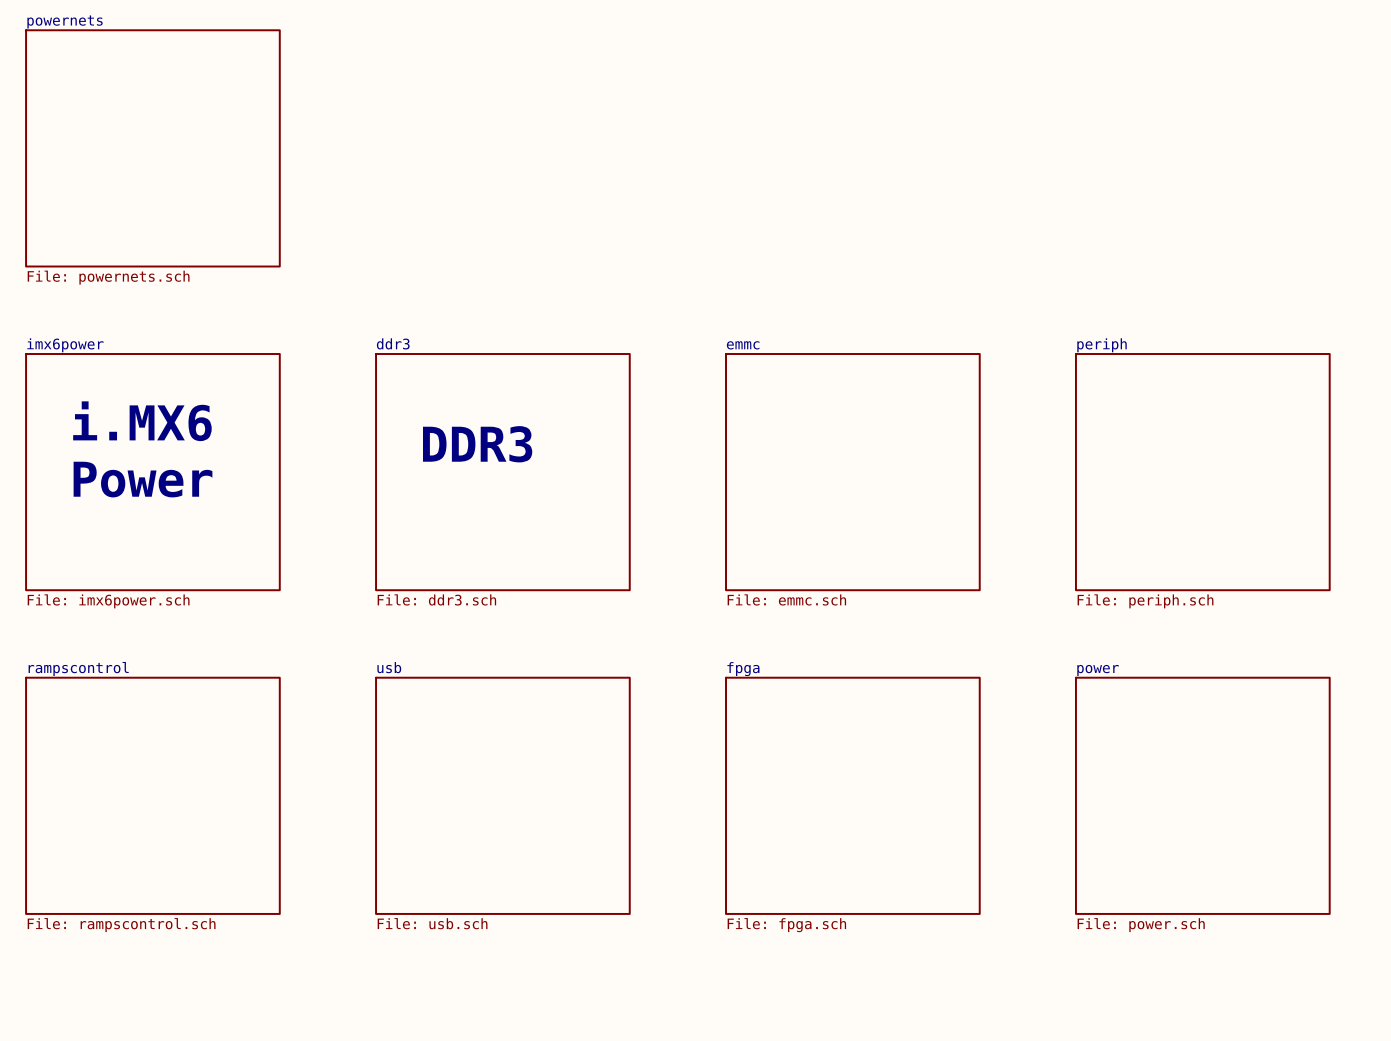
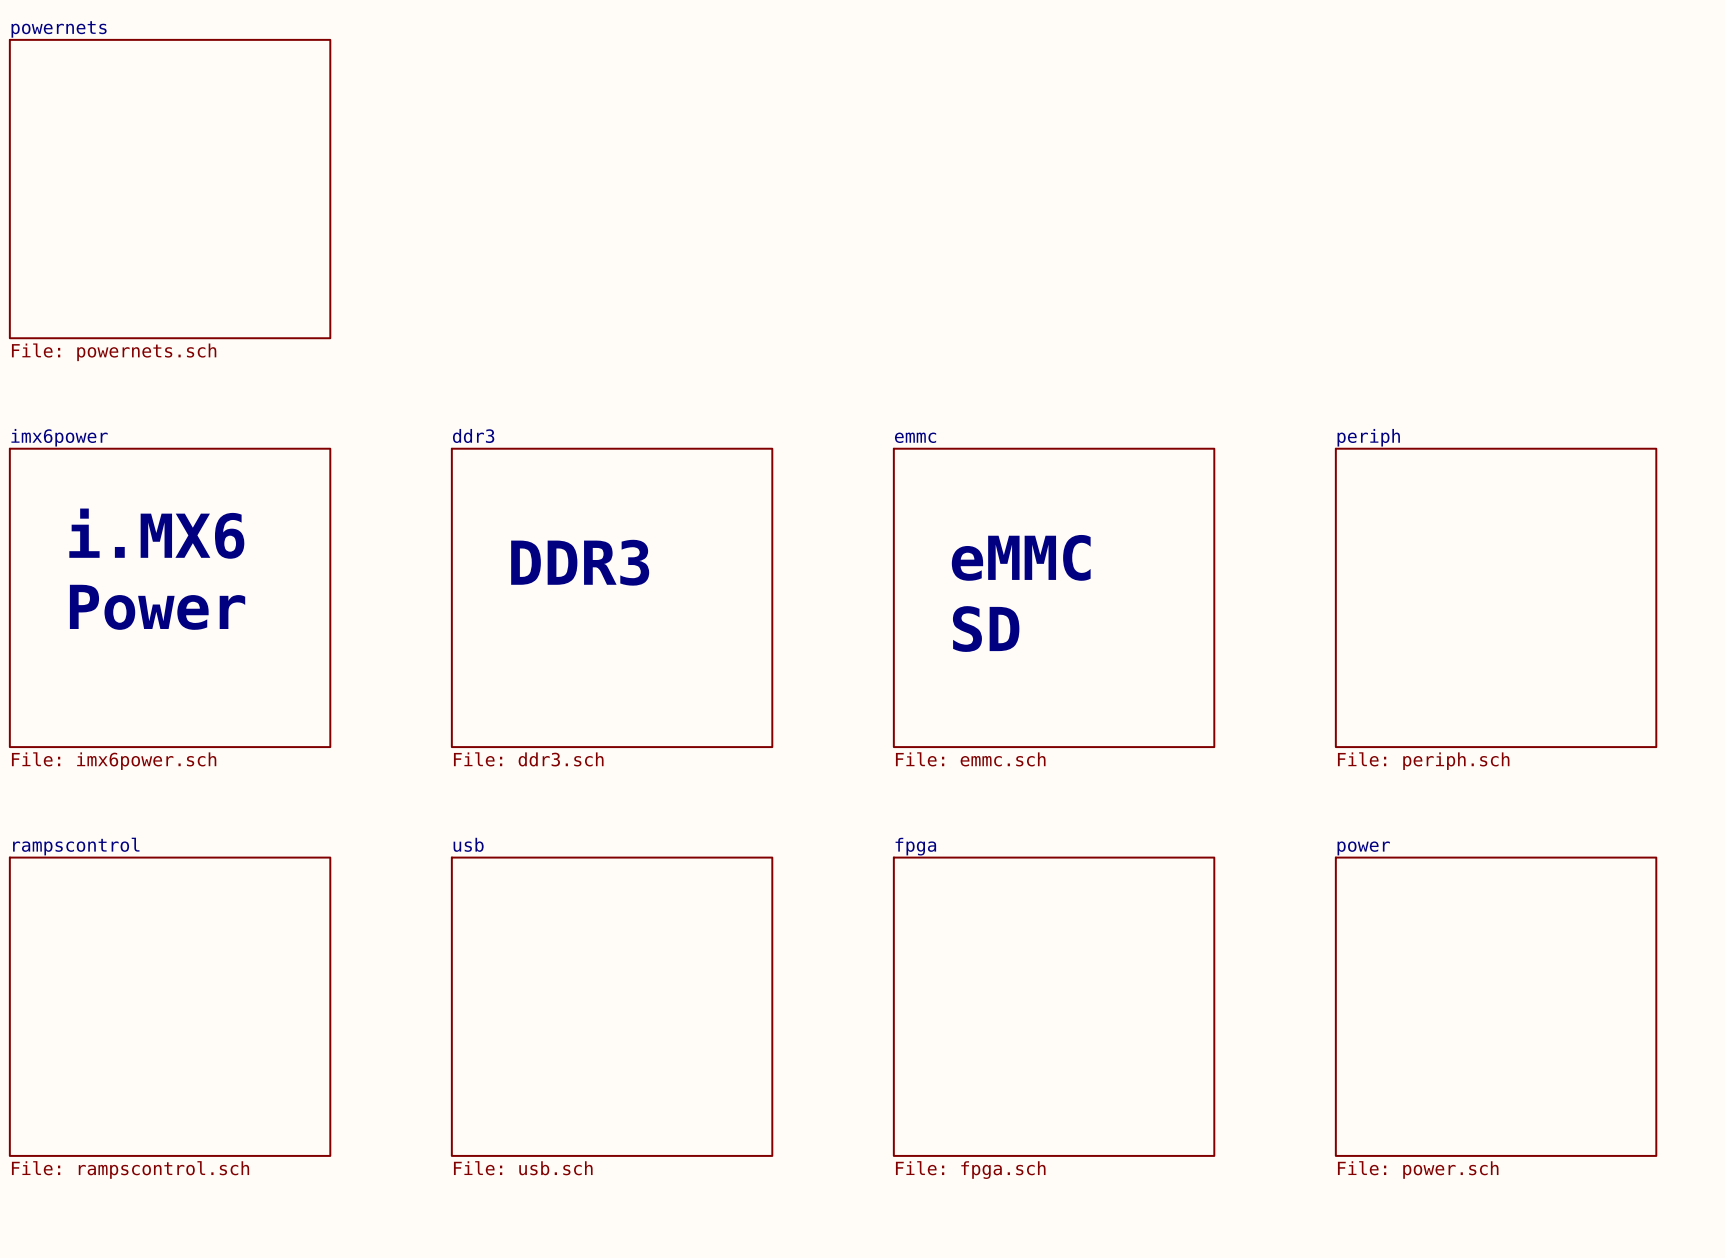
text: none -> eMMC (1021, 557)
text: none -> SD (986, 629)

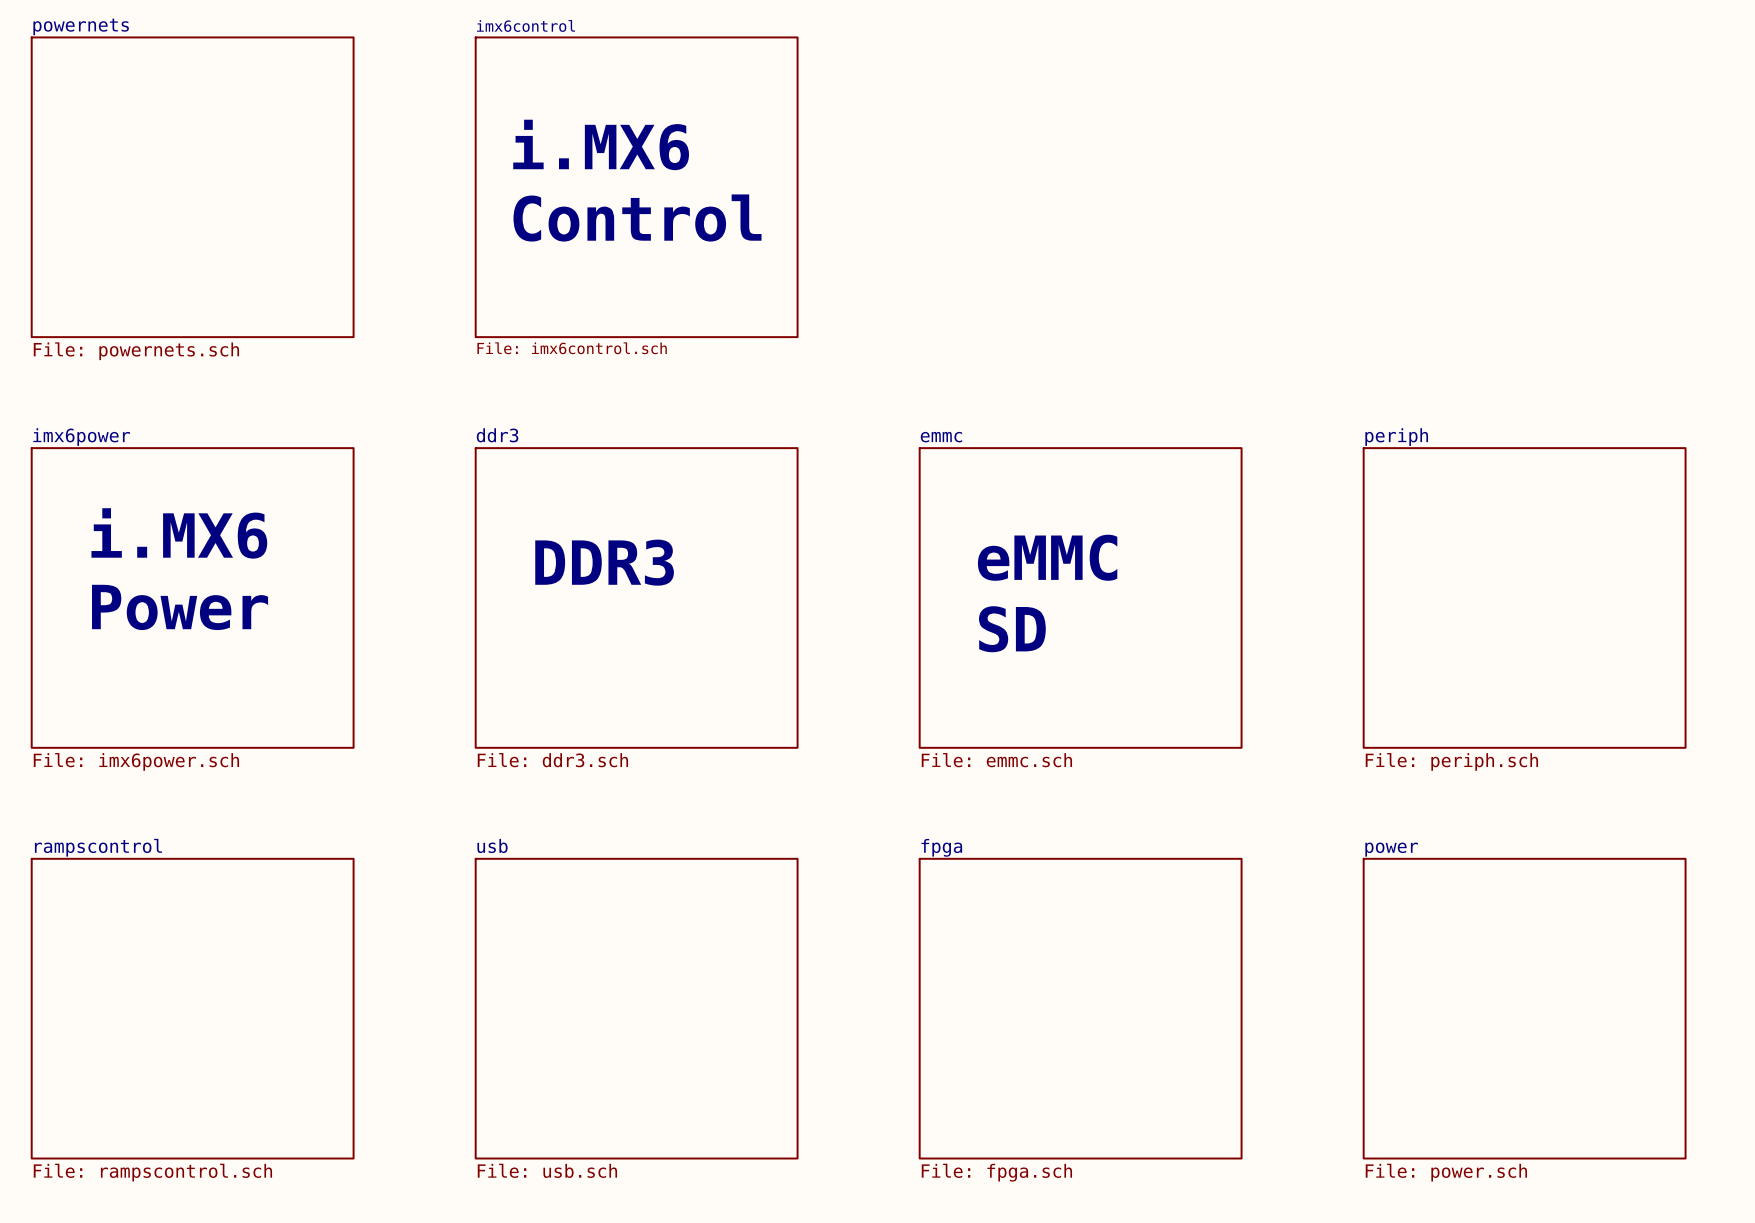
text: none -> i.MX6 (601, 144)
sheet imx6control: none -> File: imx6control.sch (636, 187)
text: none -> Control (637, 218)

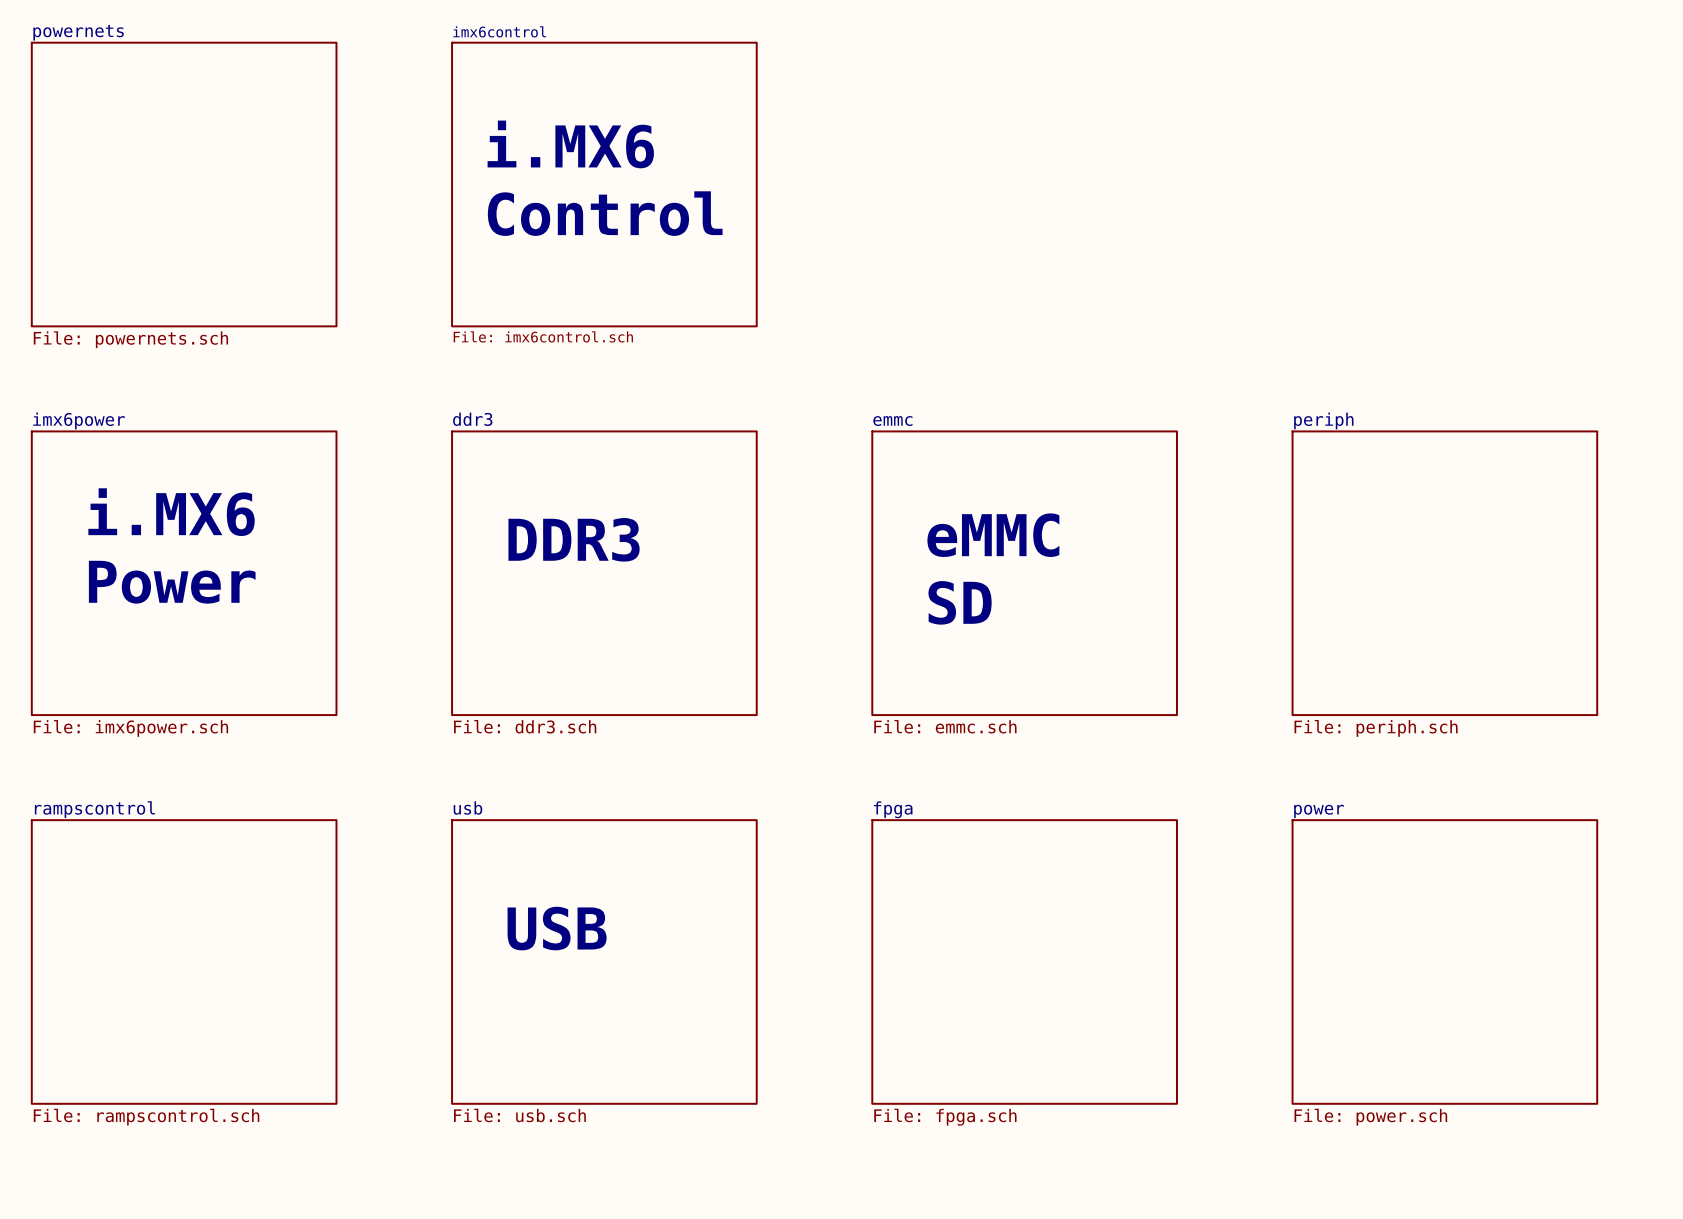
text: none -> USB (557, 928)

